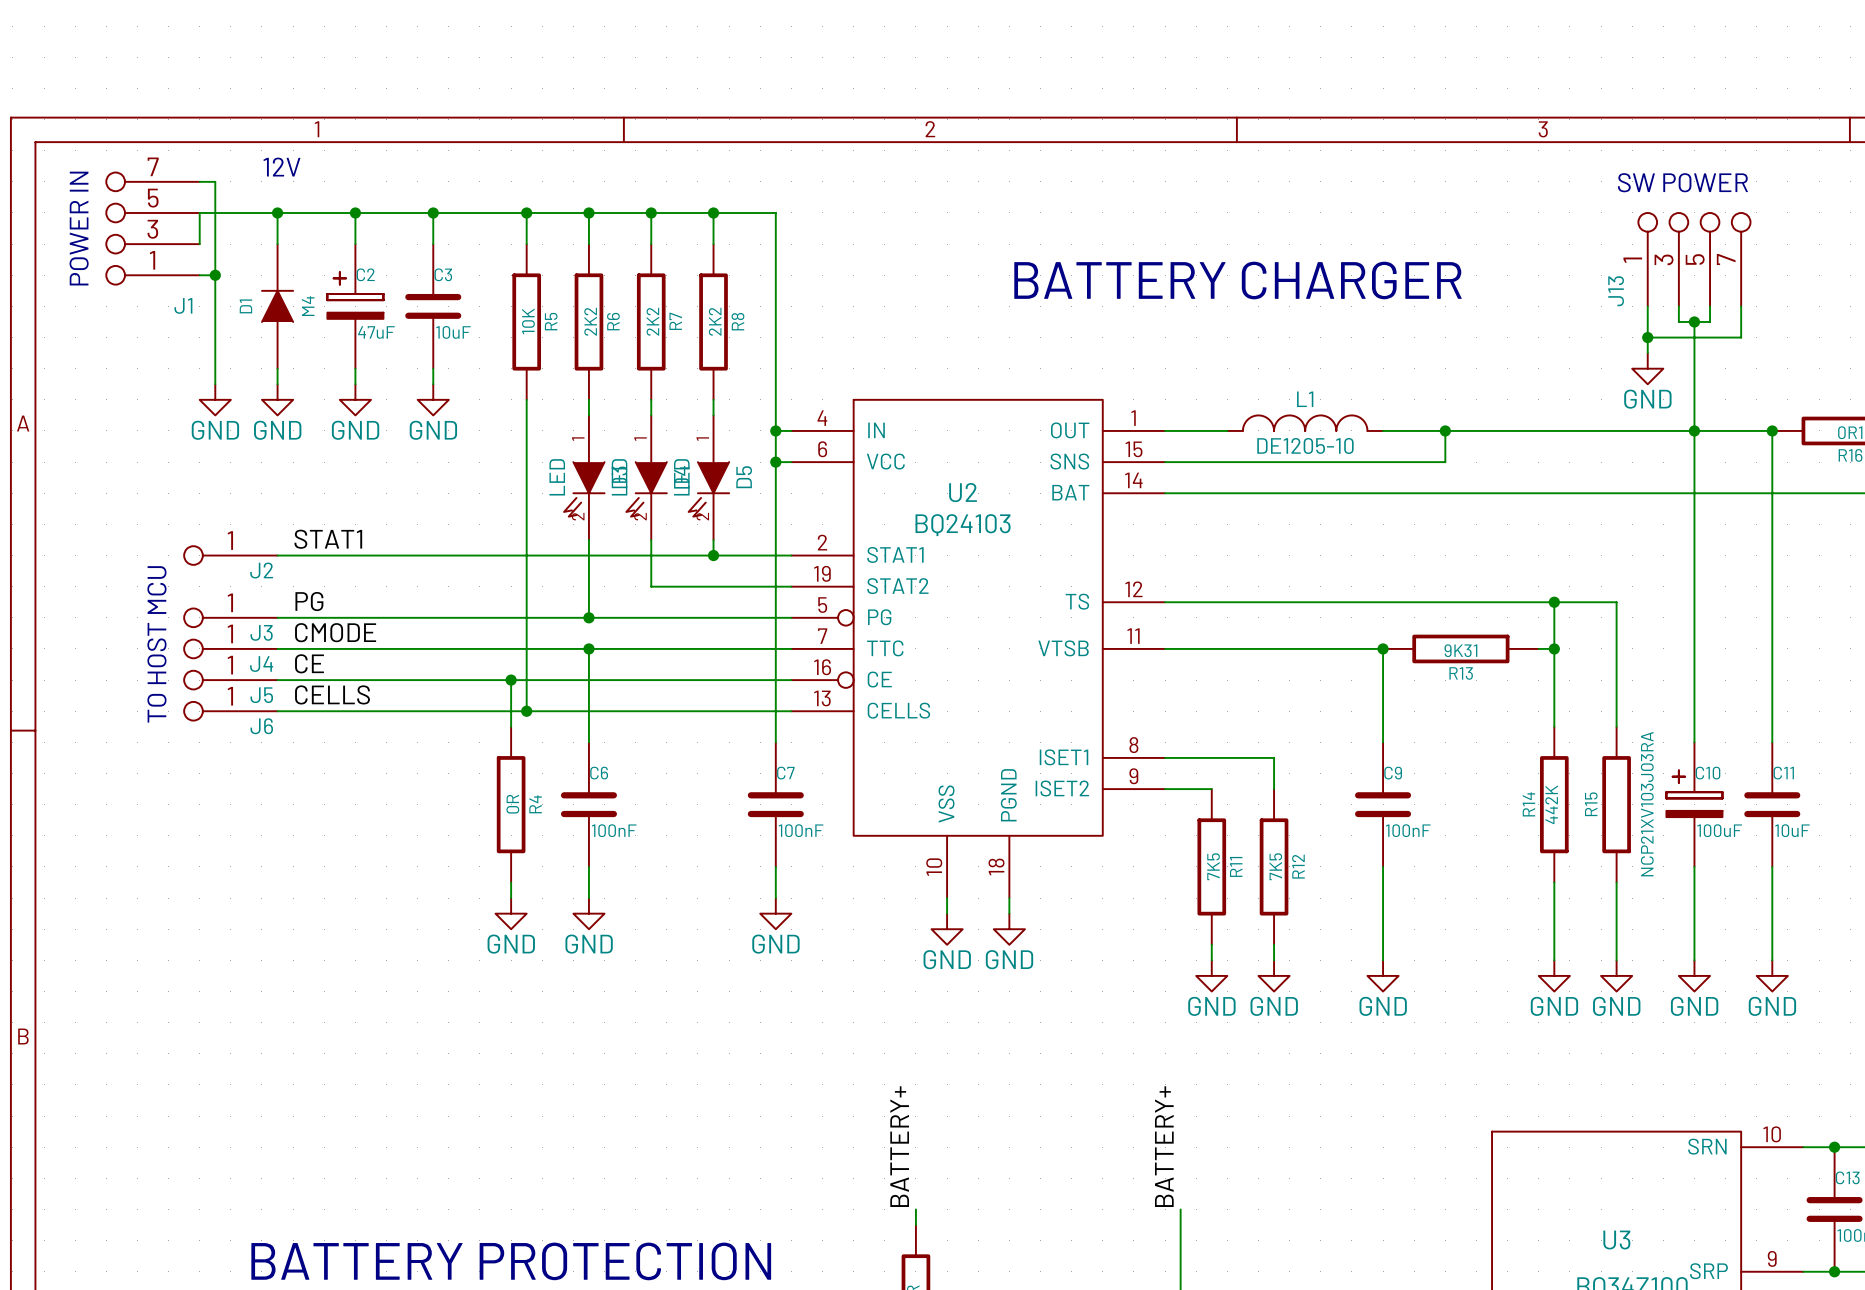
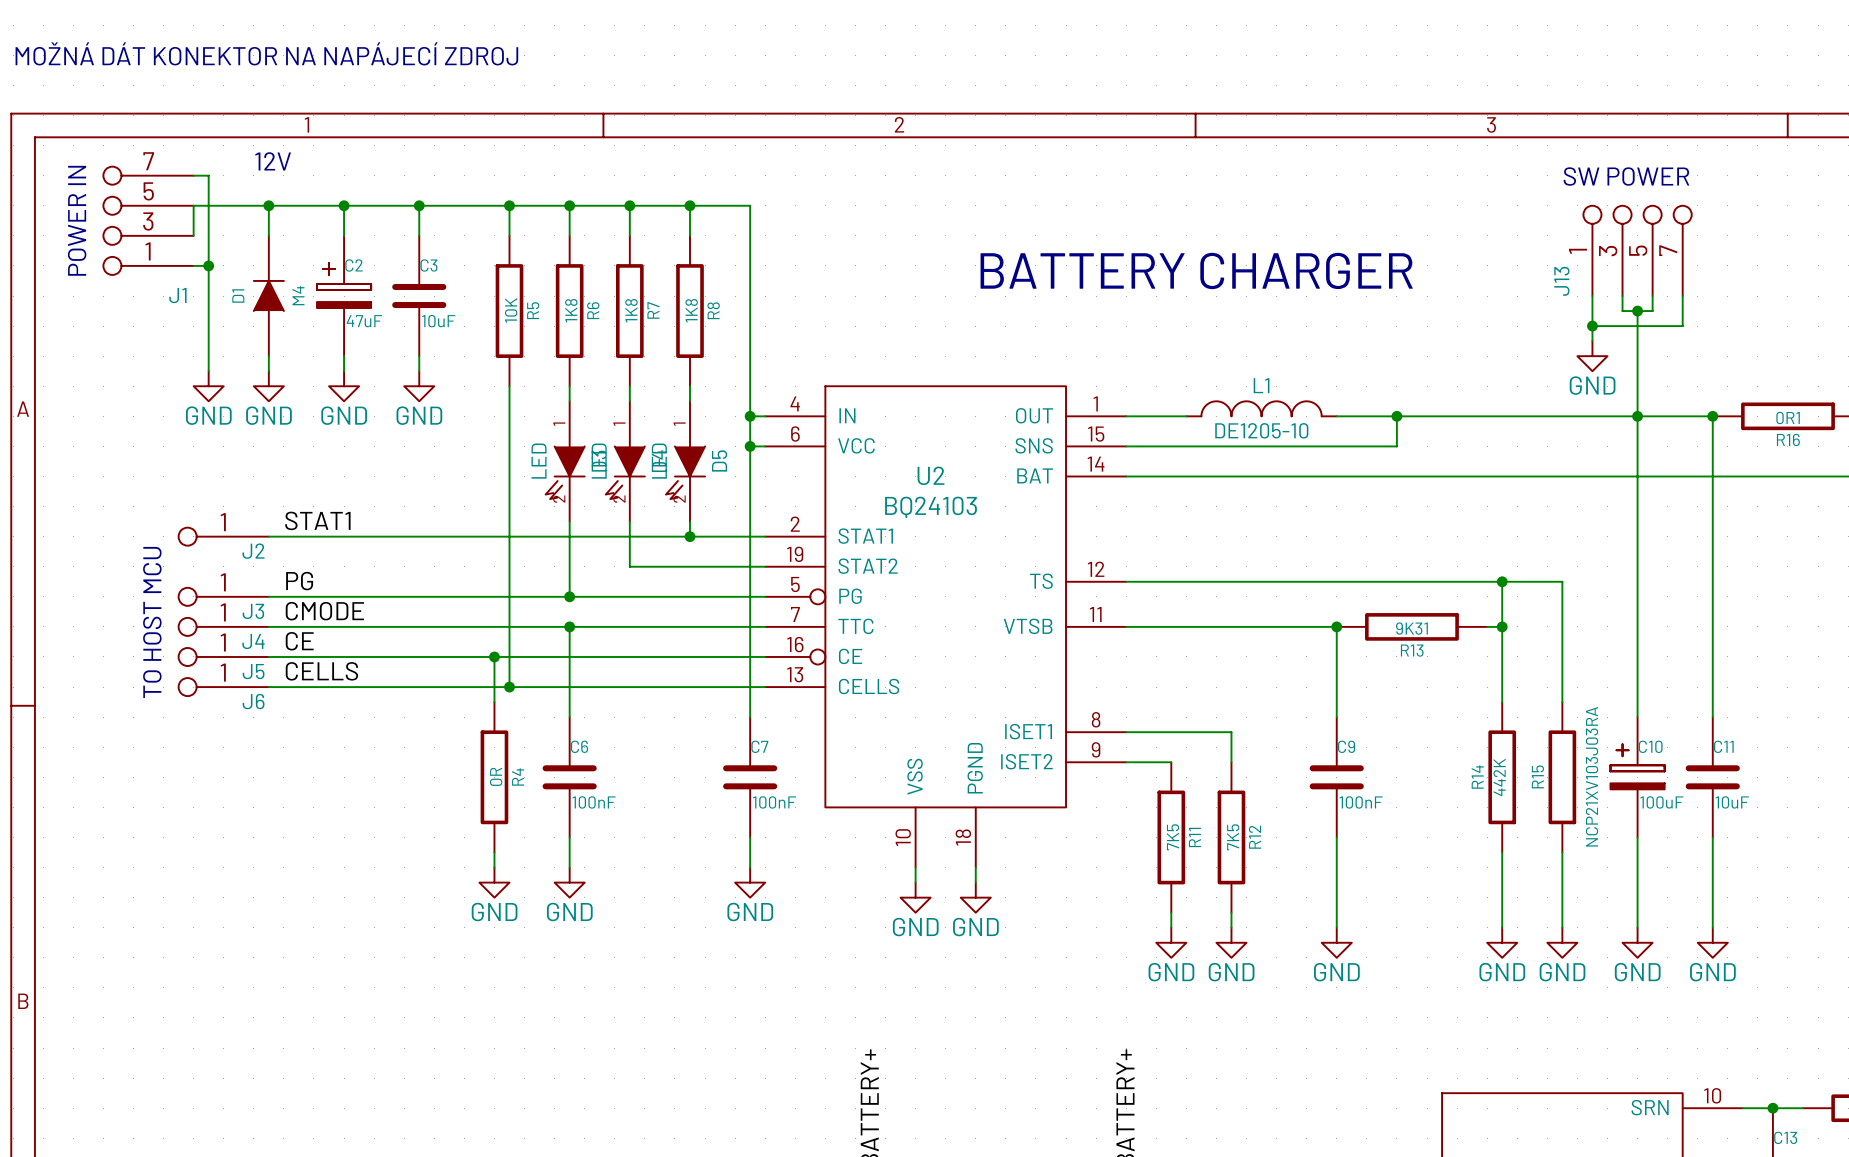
text: none -> MOŽNÁ DÁT KONEKTOR NA NAPÁJECÍ ZDROJ (266, 53)
R6 value: 2K2 (590, 321) -> 1K8 (571, 310)
R7 value: 2K2 (652, 321) -> 1K8 (631, 310)
R8 value: 2K2 (715, 321) -> 1K8 (691, 310)

